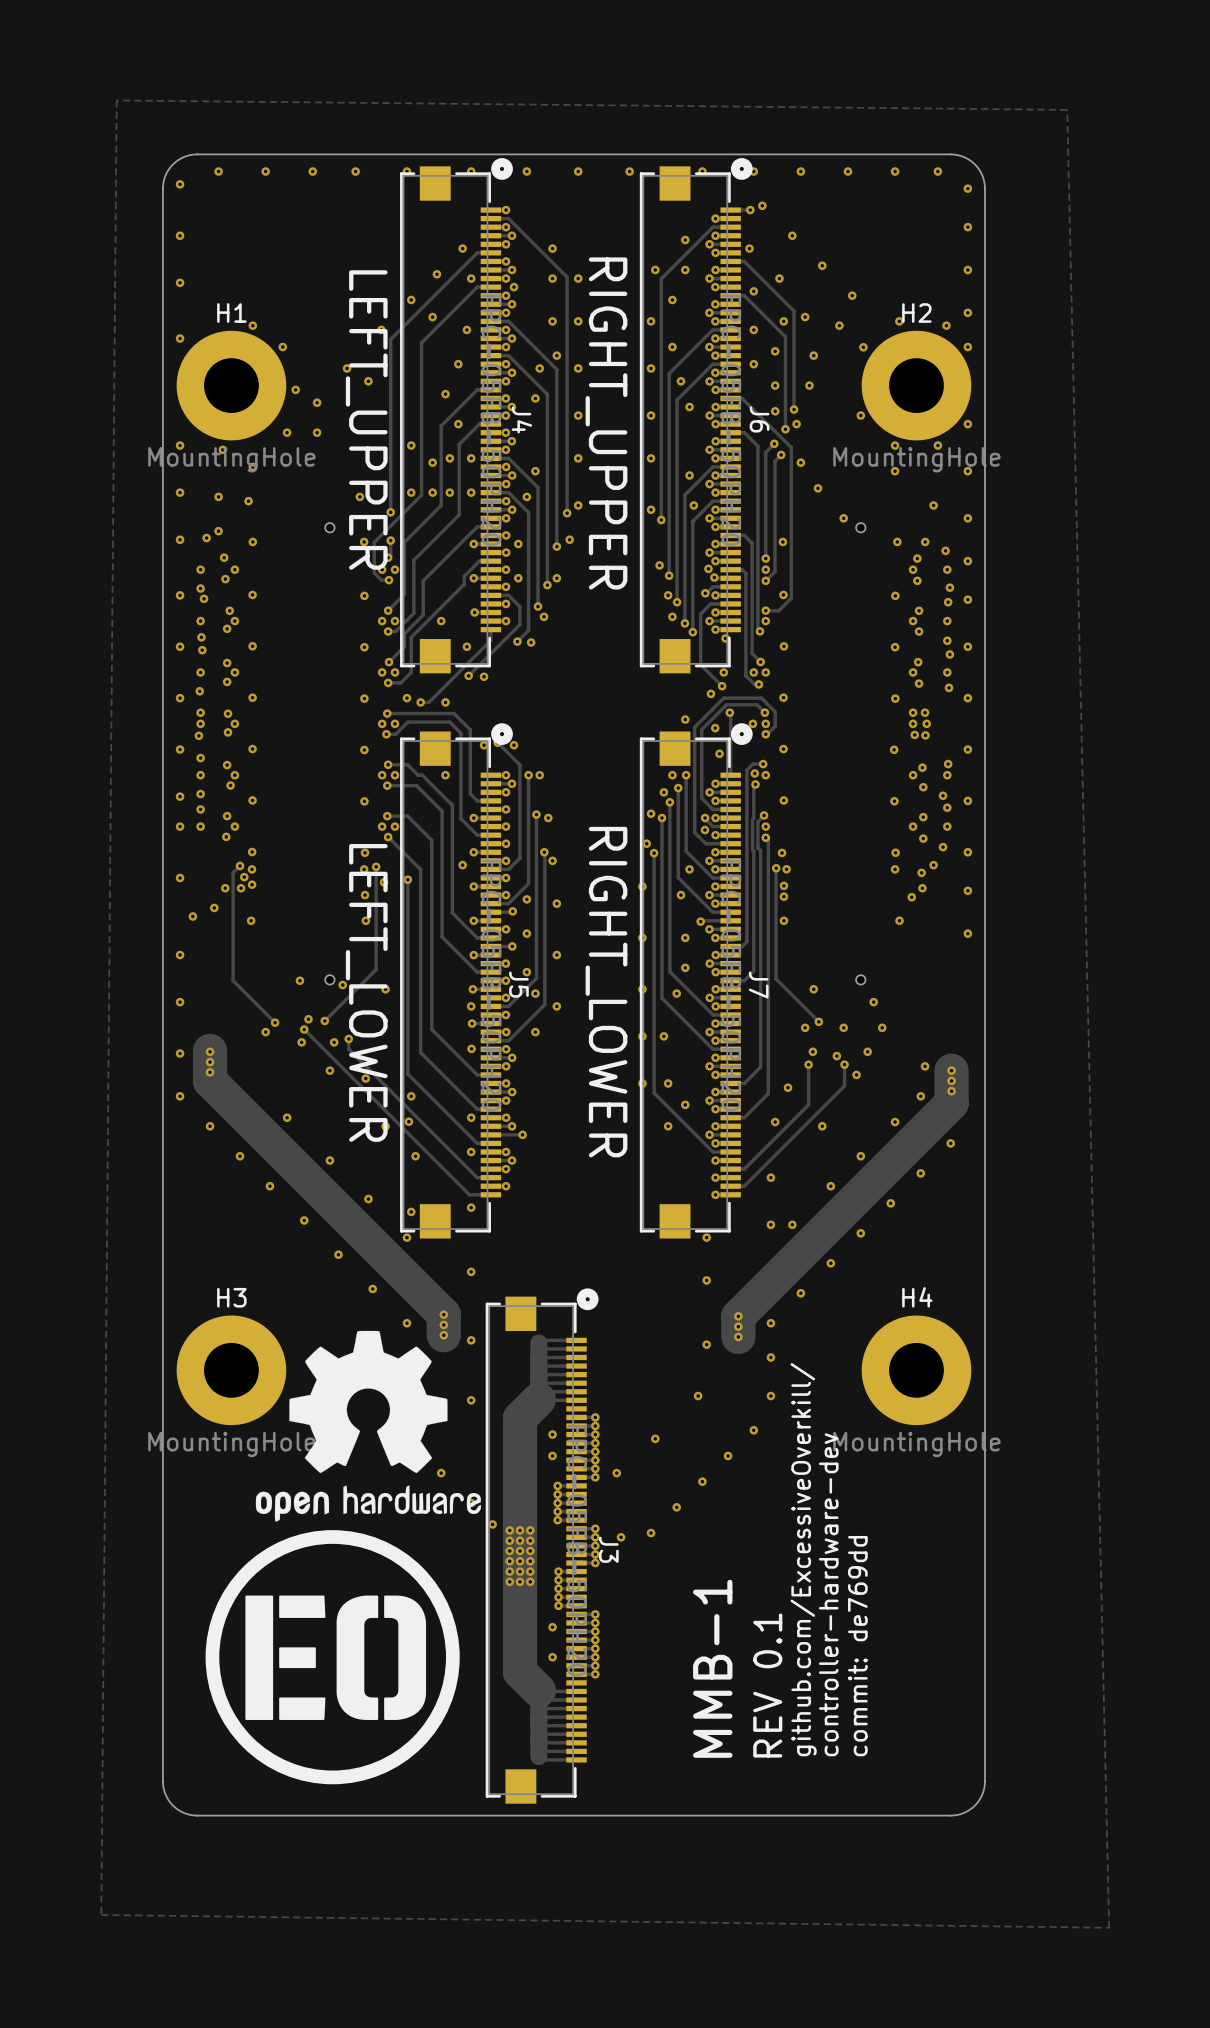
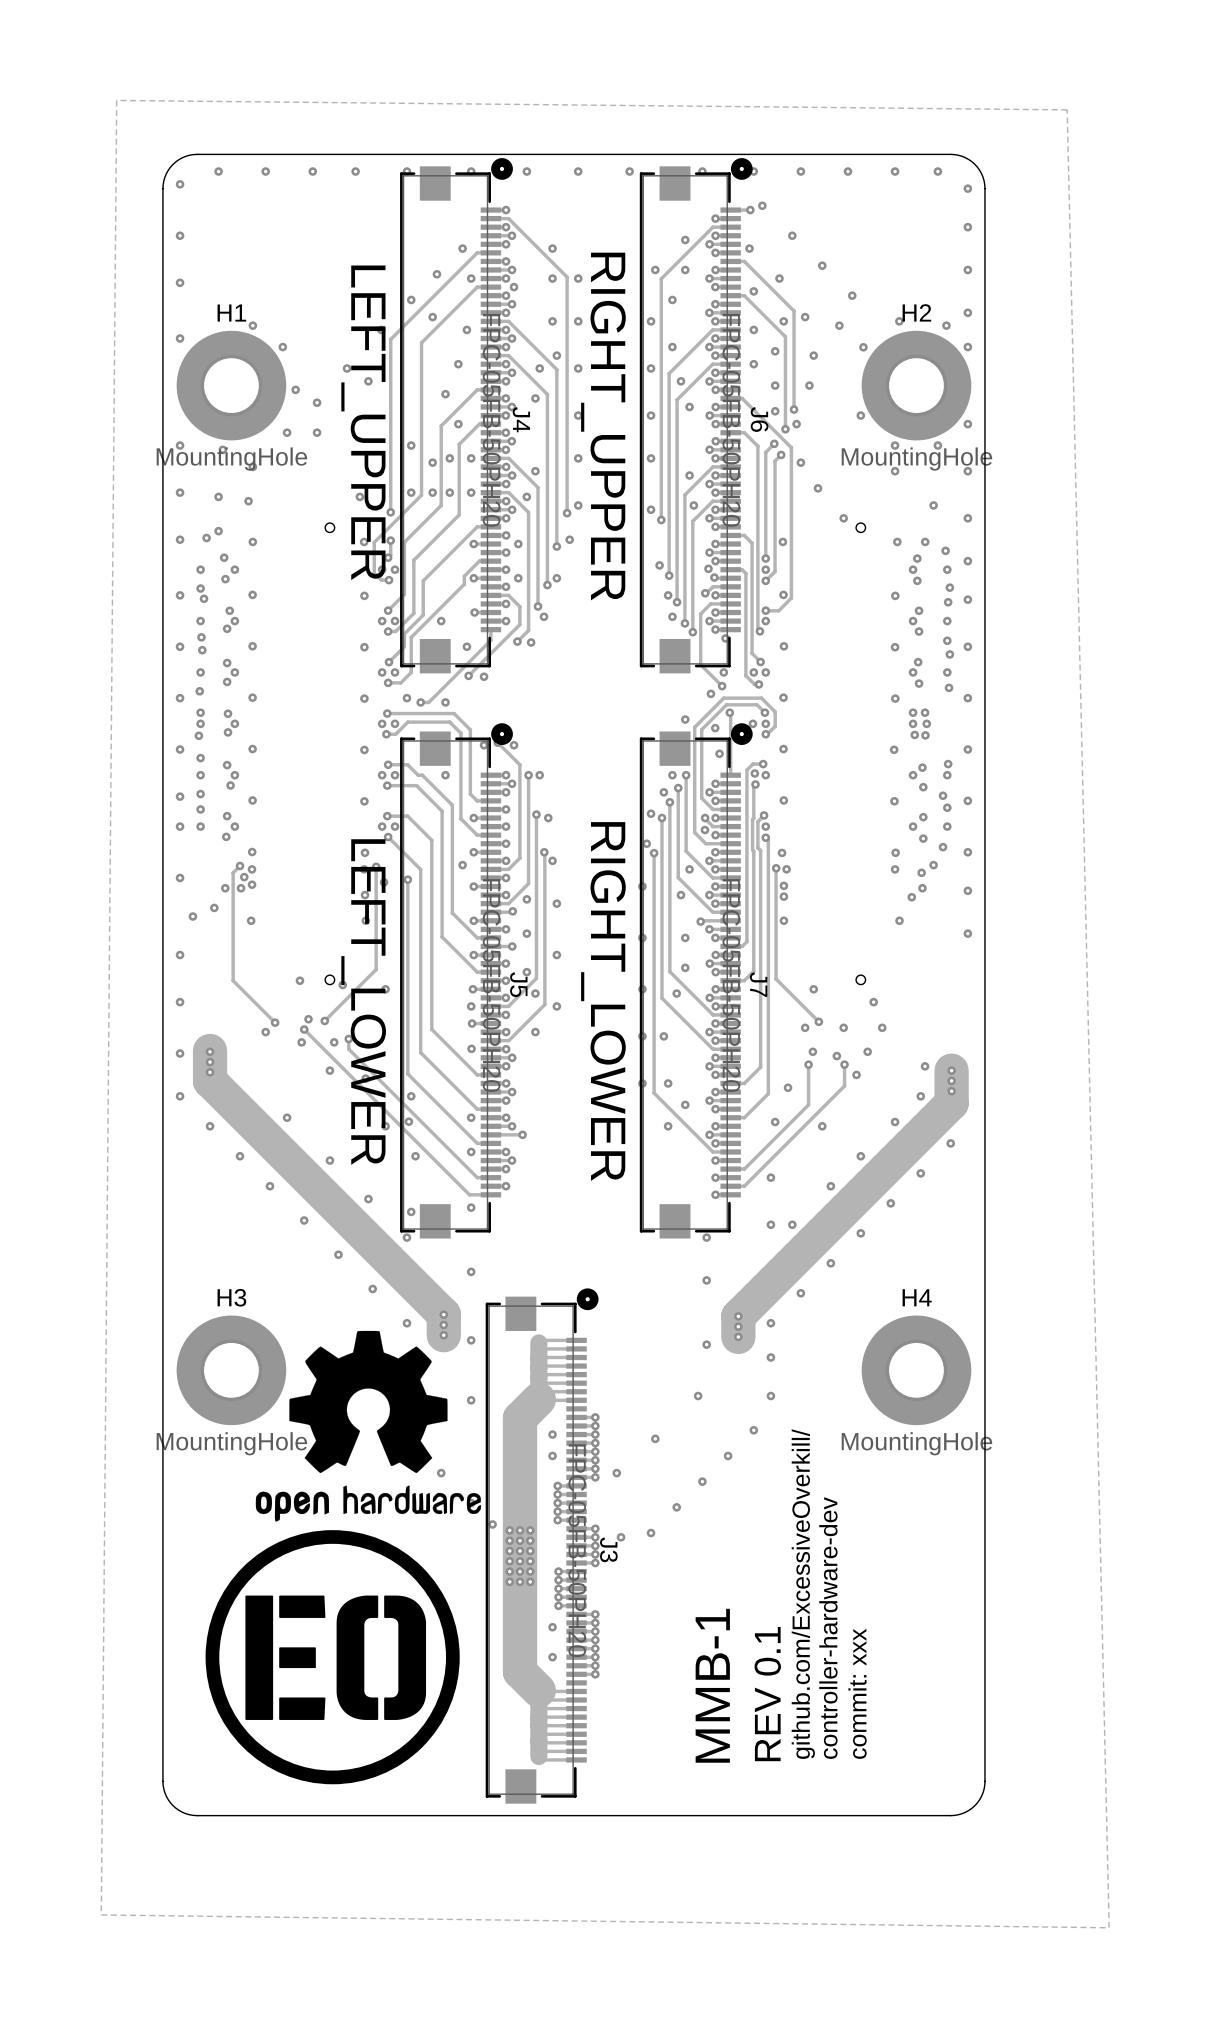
text: commit: de769dd (857, 1646) -> commit: xxx (857, 1693)

